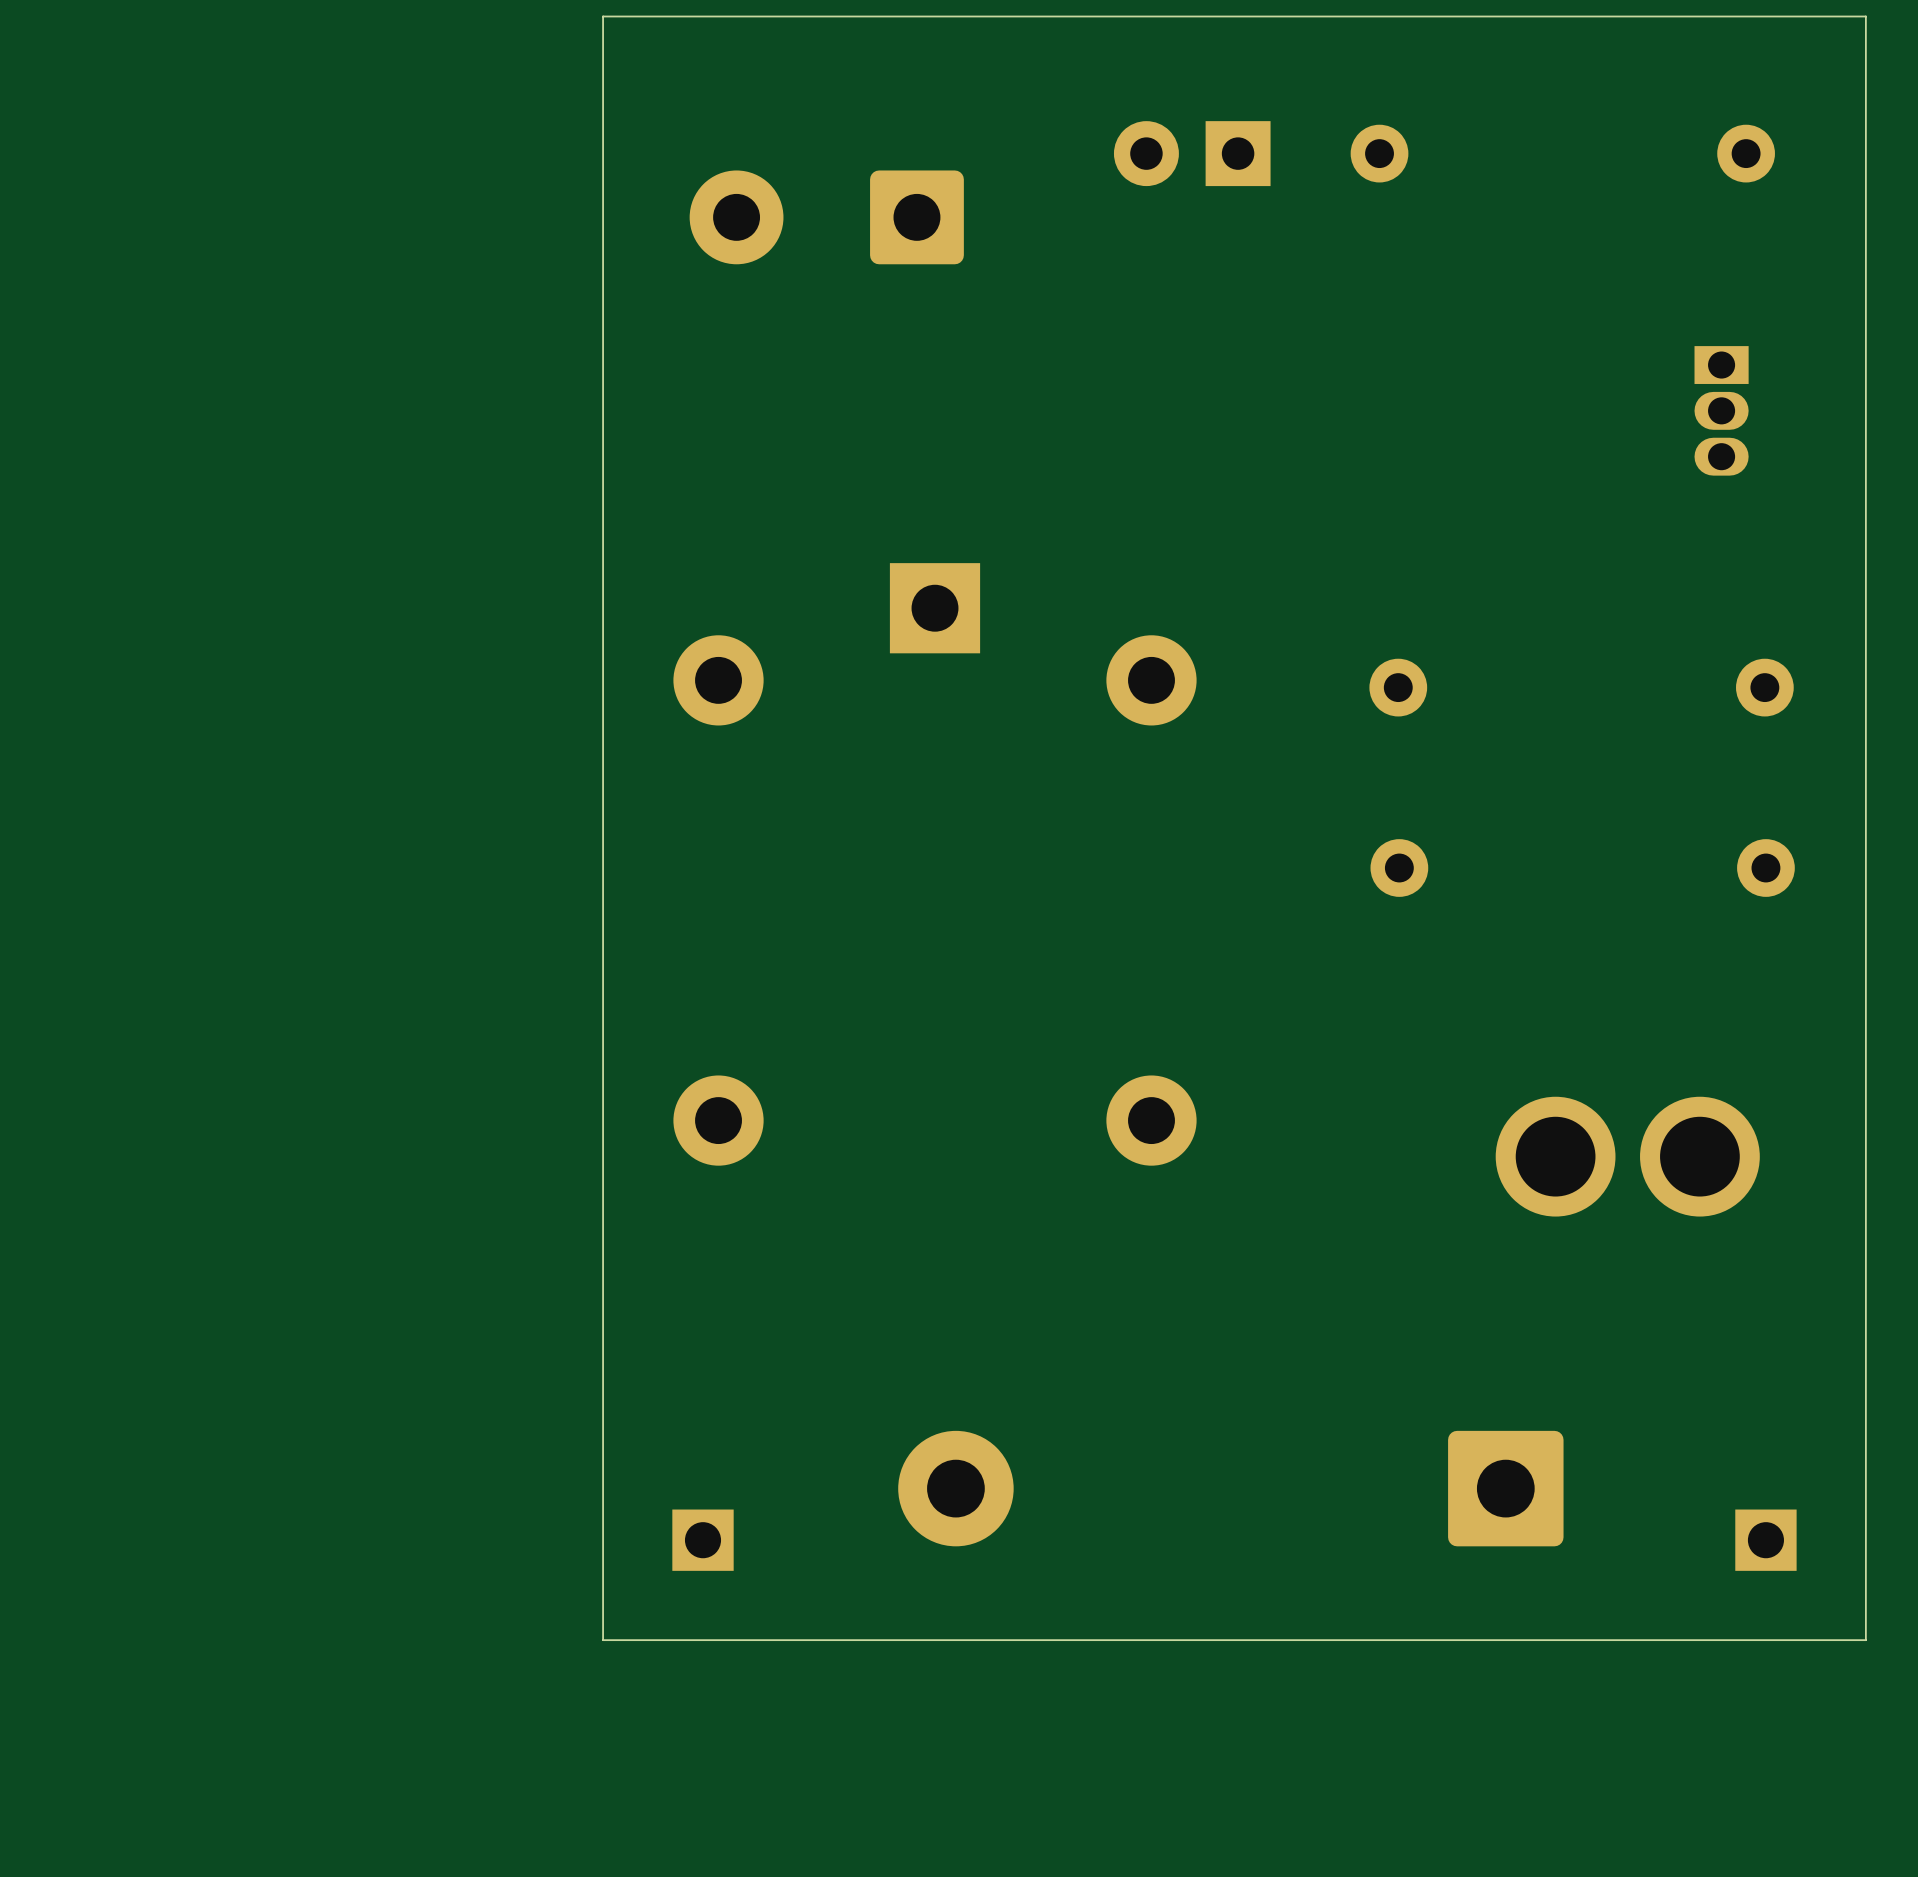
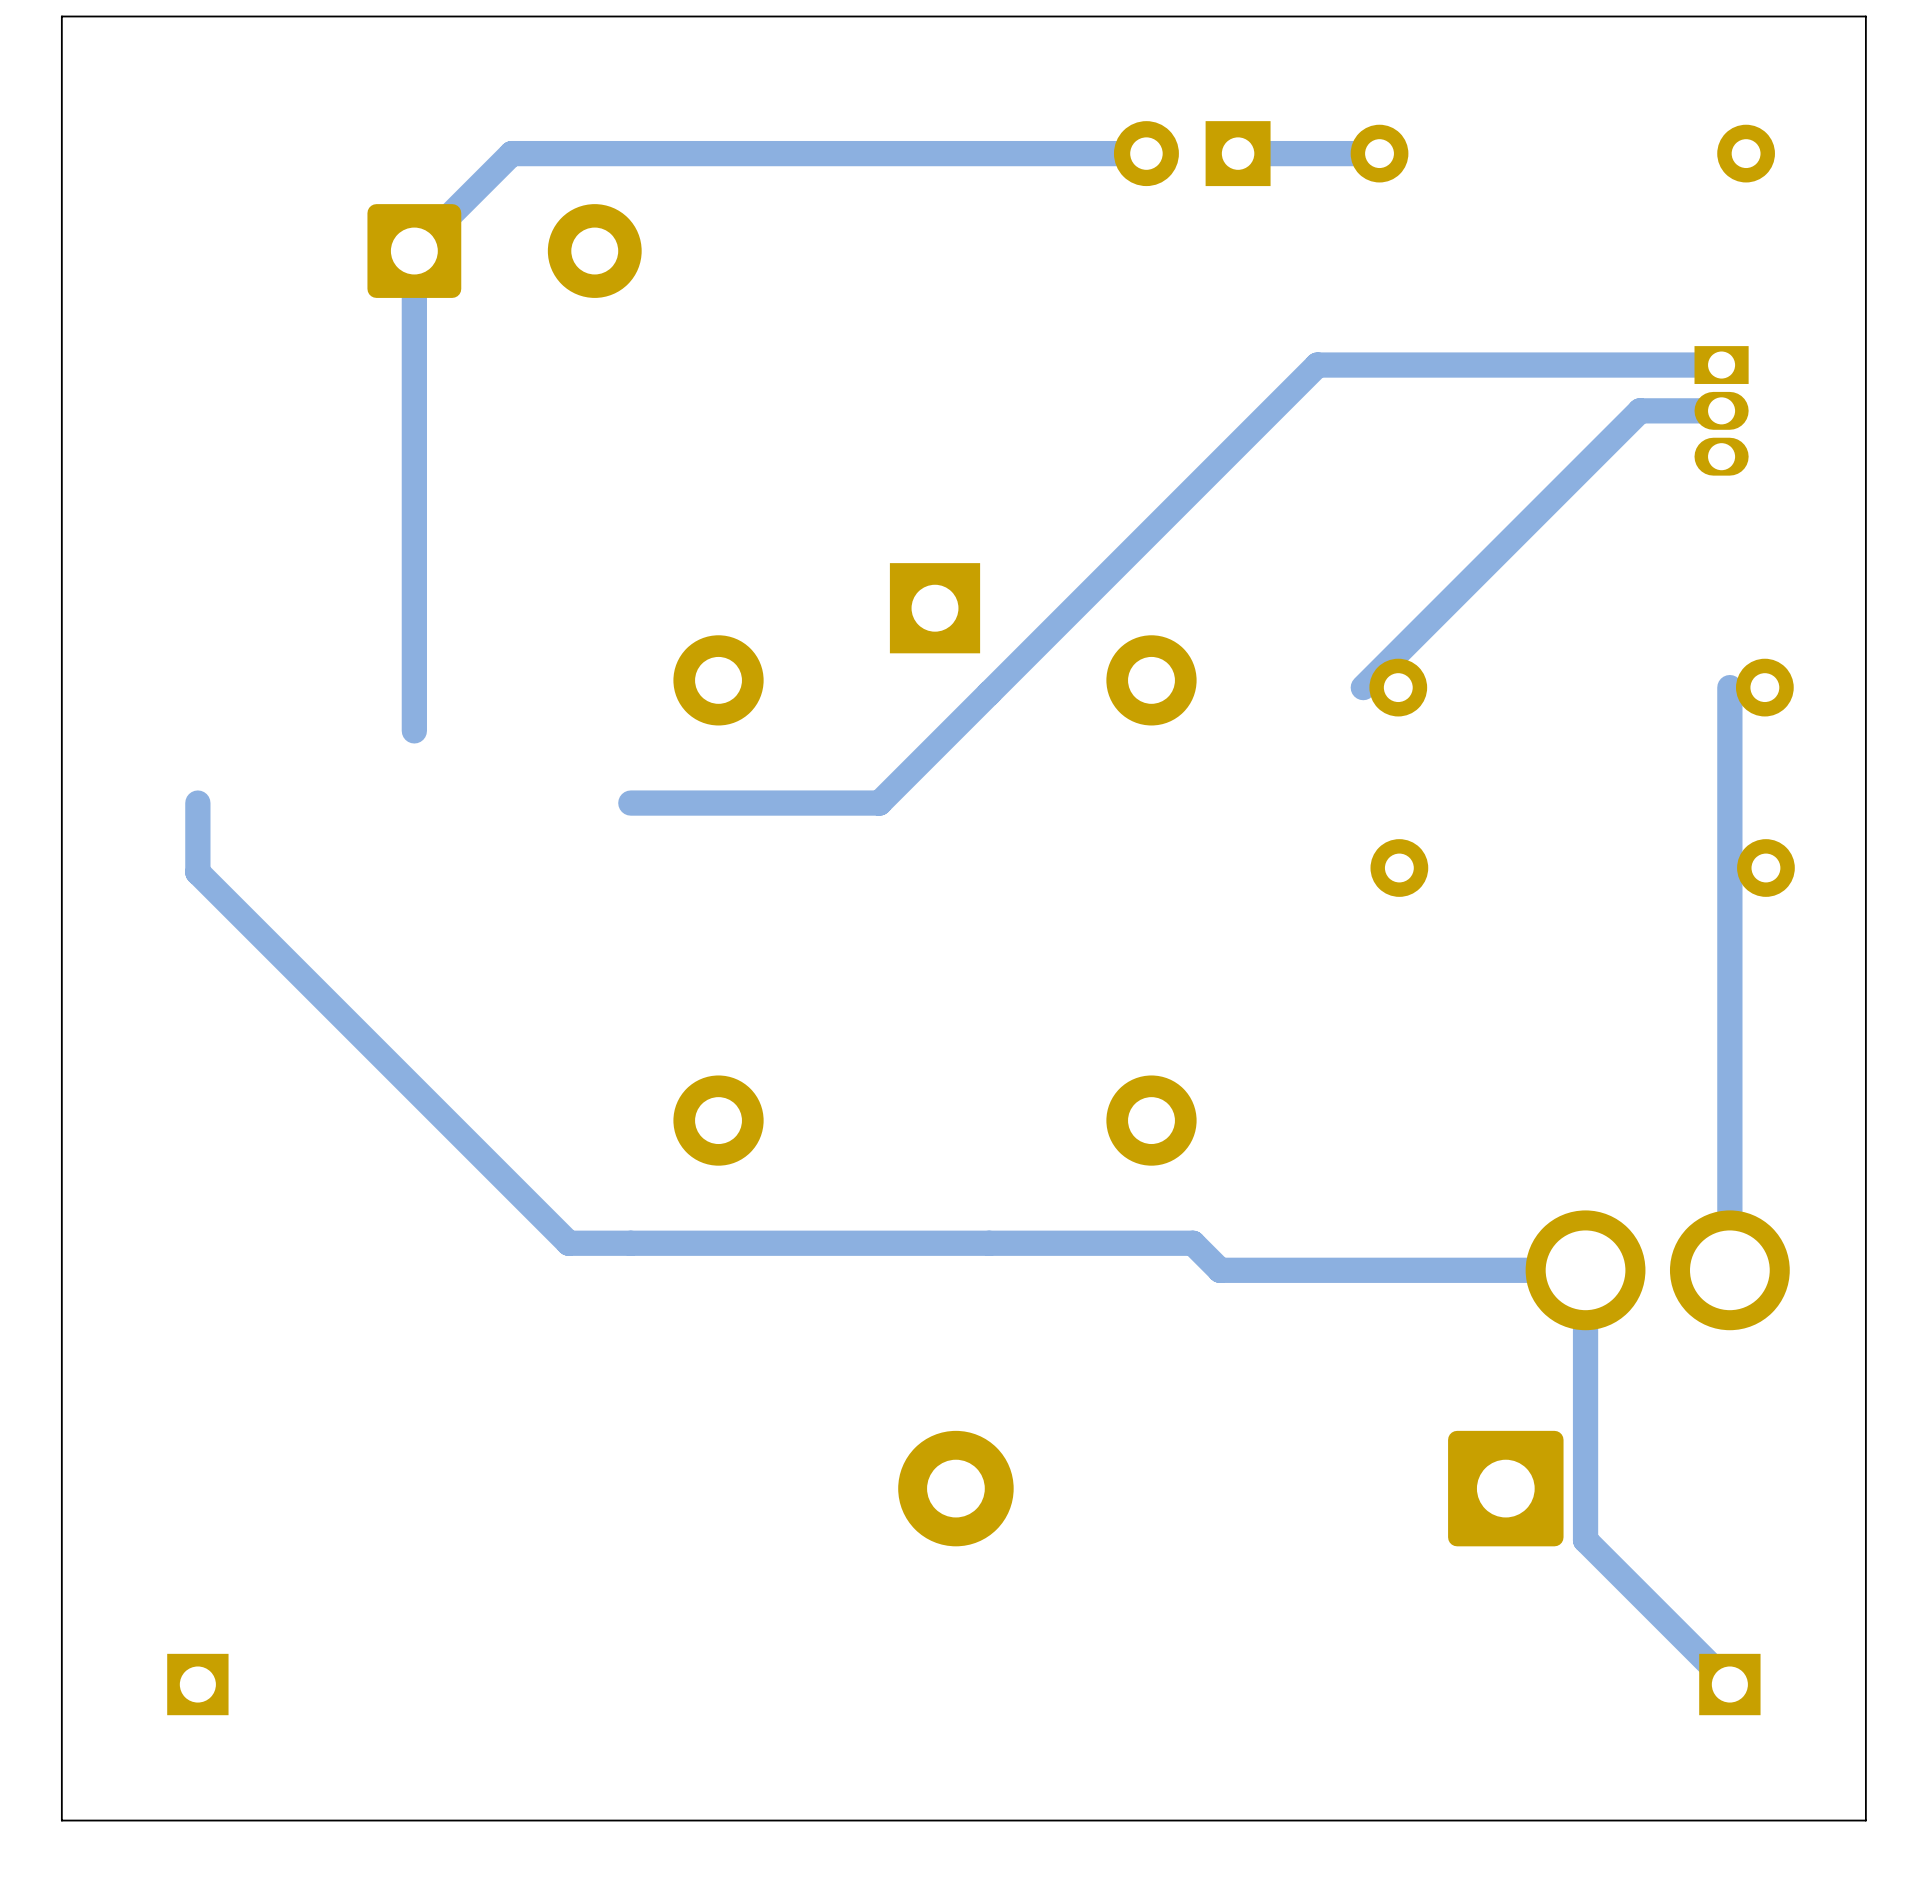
board edge: (603, 16) (603, 1640) (1865, 1640) -> (603, 16) (61, 16) (61, 1820) (1865, 1820) (1865, 1640)
track: none -> (1146, 153) (511, 153) (414, 251) (414, 730)
track: none -> (1379, 153) (1238, 153)
part rotation: 0° (826, 217) -> 180° (504, 251)
part position: (826, 217) -> (504, 251)
track: none -> (1721, 365) (1317, 365) (879, 803) (630, 803)
track: none -> (1721, 410) (1640, 410) (1363, 687)
track: none -> (1729, 687) (1729, 1270)
track: none -> (197, 803) (197, 872) (568, 1243) (1192, 1243) (1220, 1270) (1585, 1270) (1585, 1540) (1729, 1684)
part position: (1627, 1156) -> (1657, 1270)
part: (703, 1540) -> none
part position: (1765, 1540) -> (1729, 1684)
part: none -> (197, 1684)

